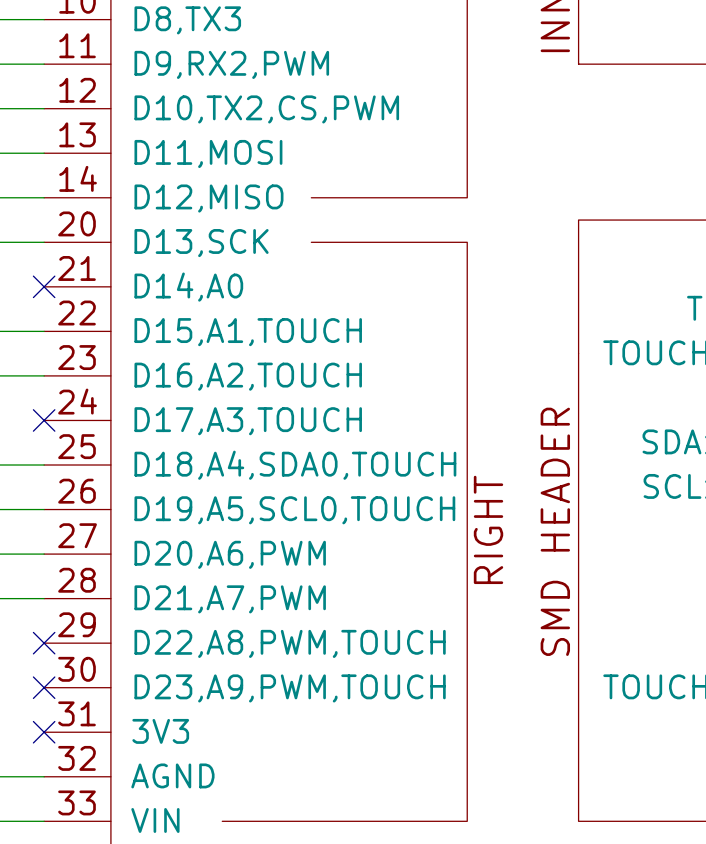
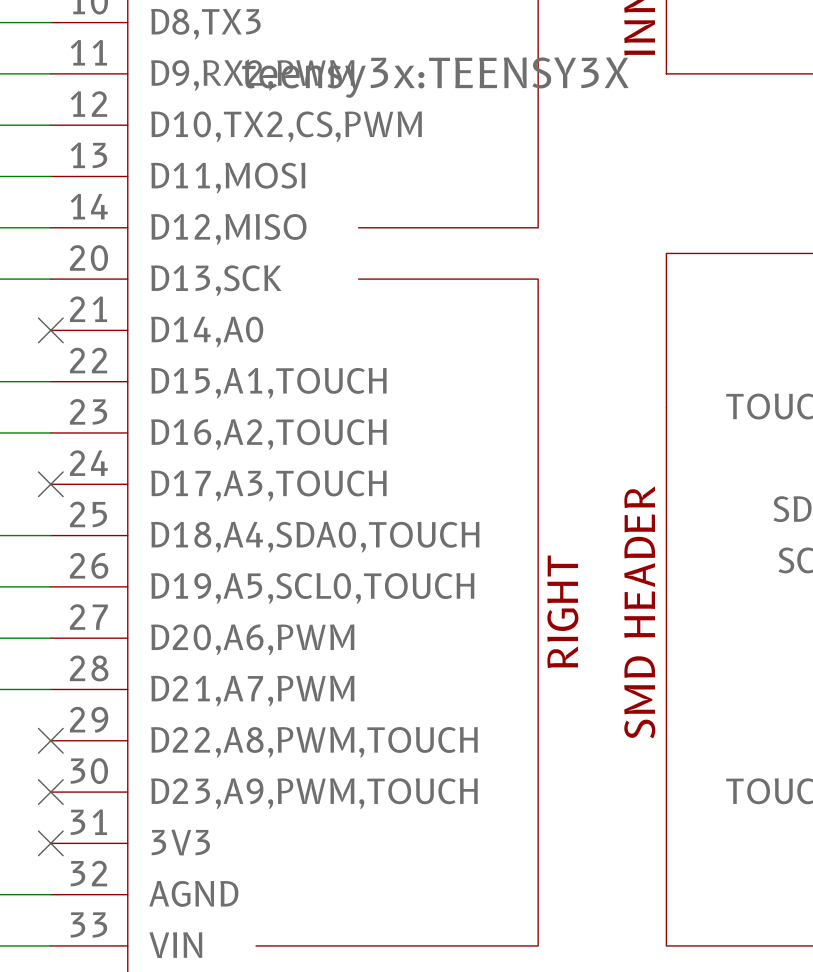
part text: none -> teensy3x:TEENSY3X (435, 77)

